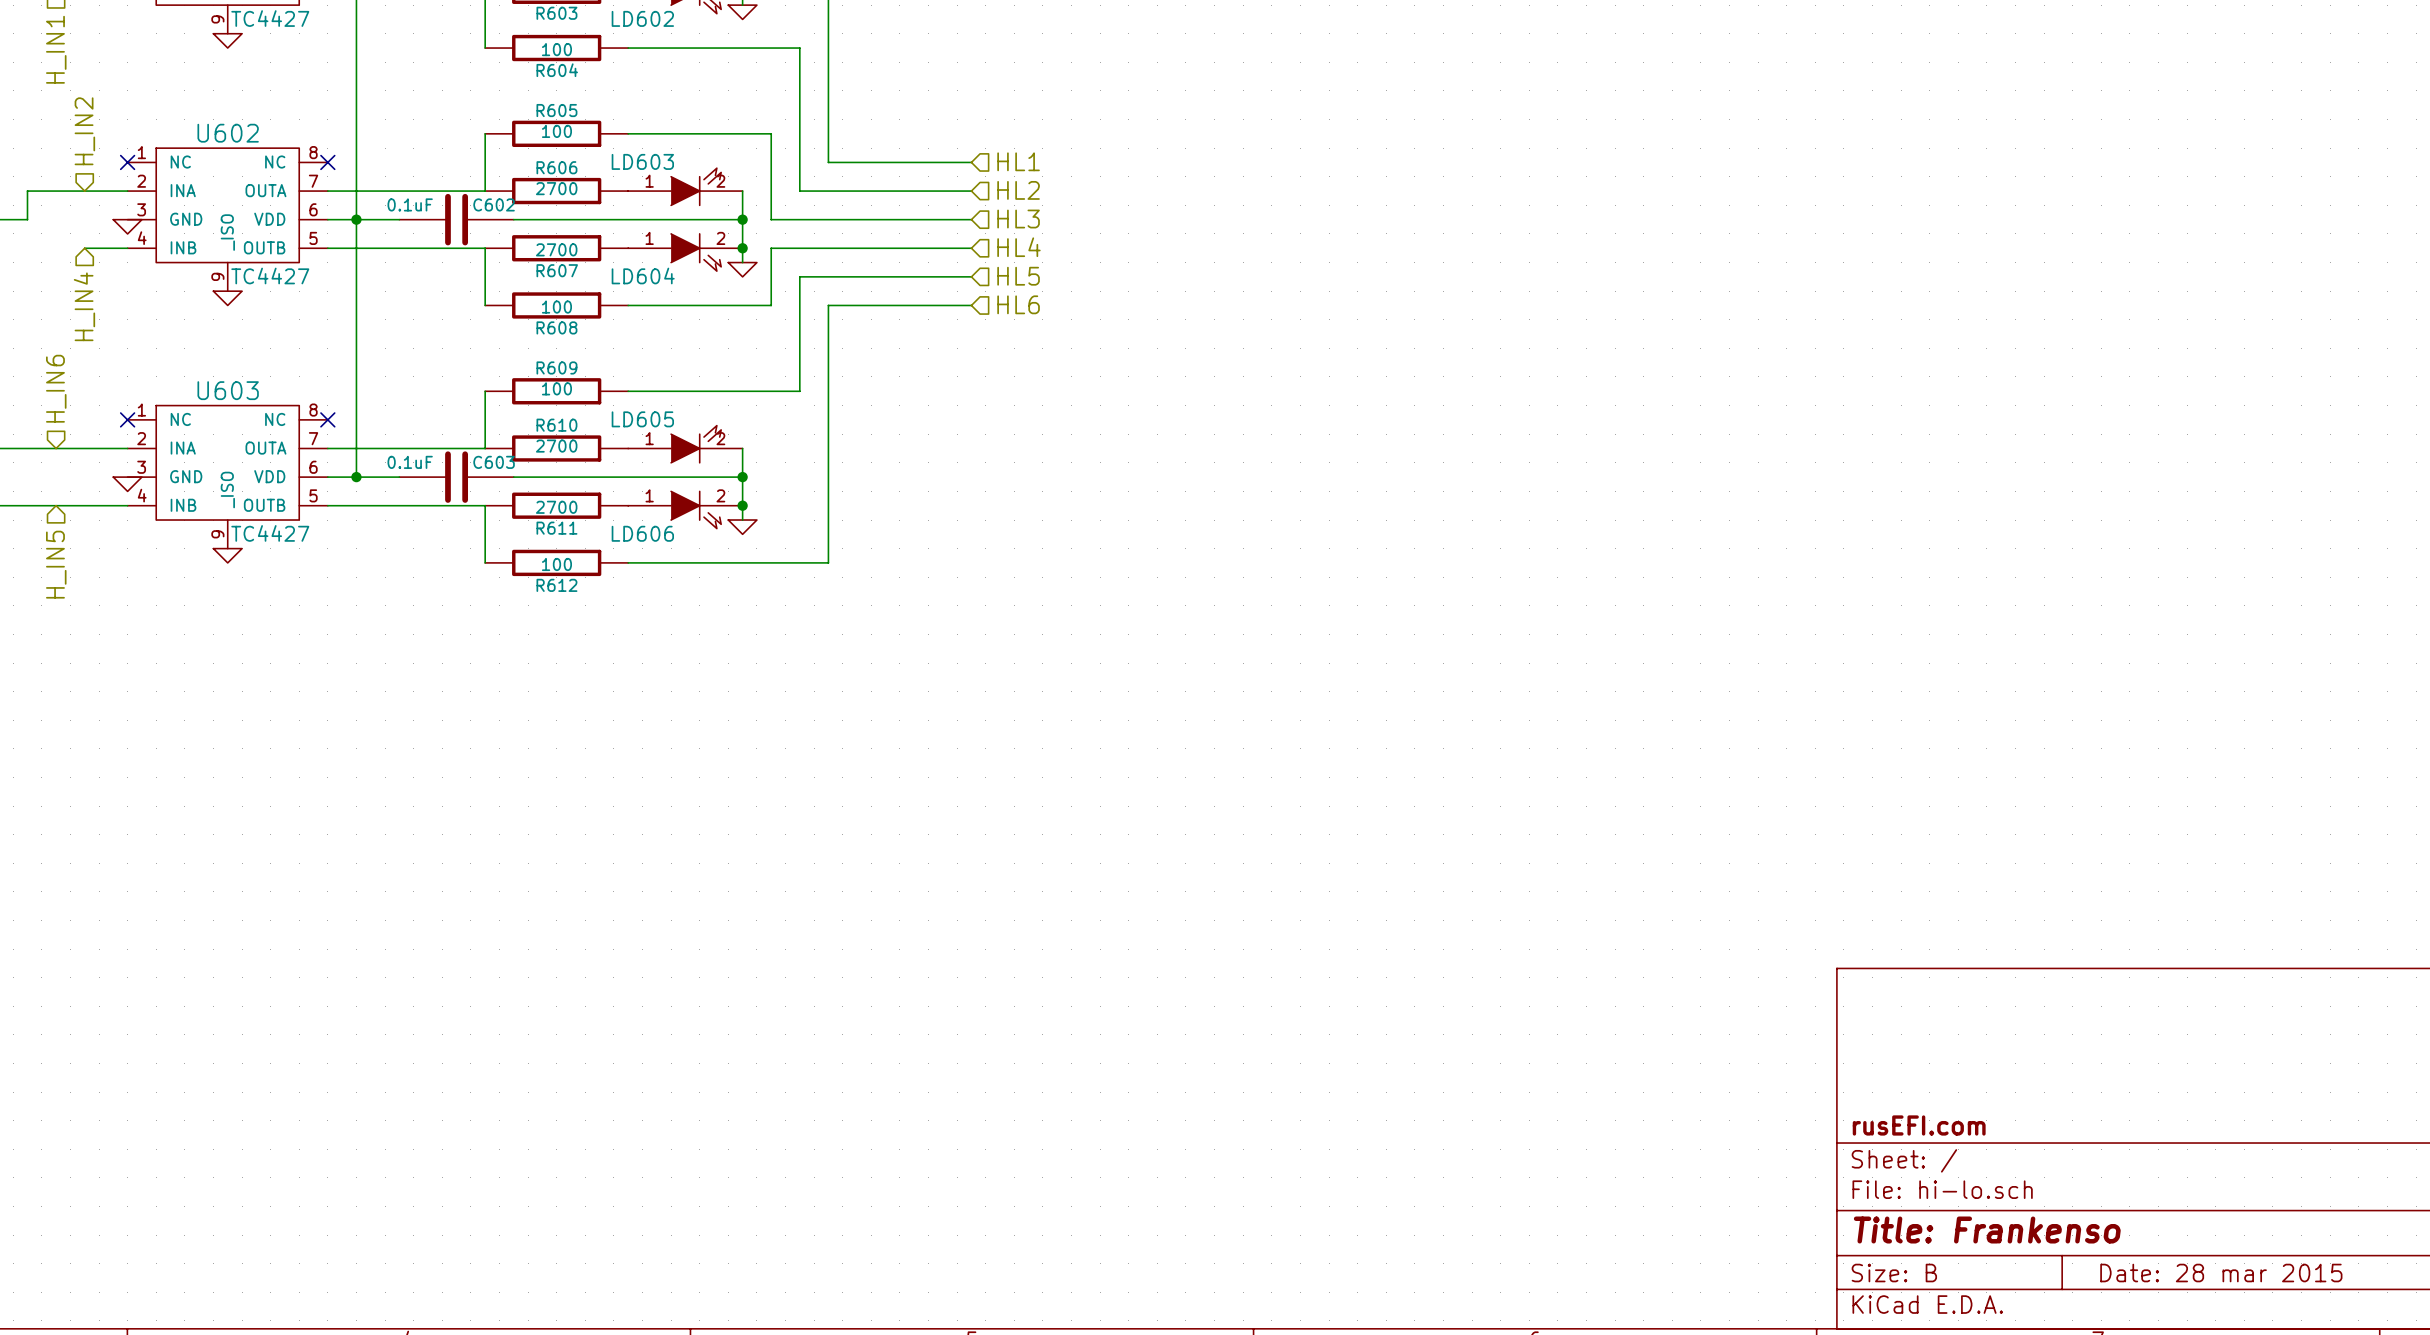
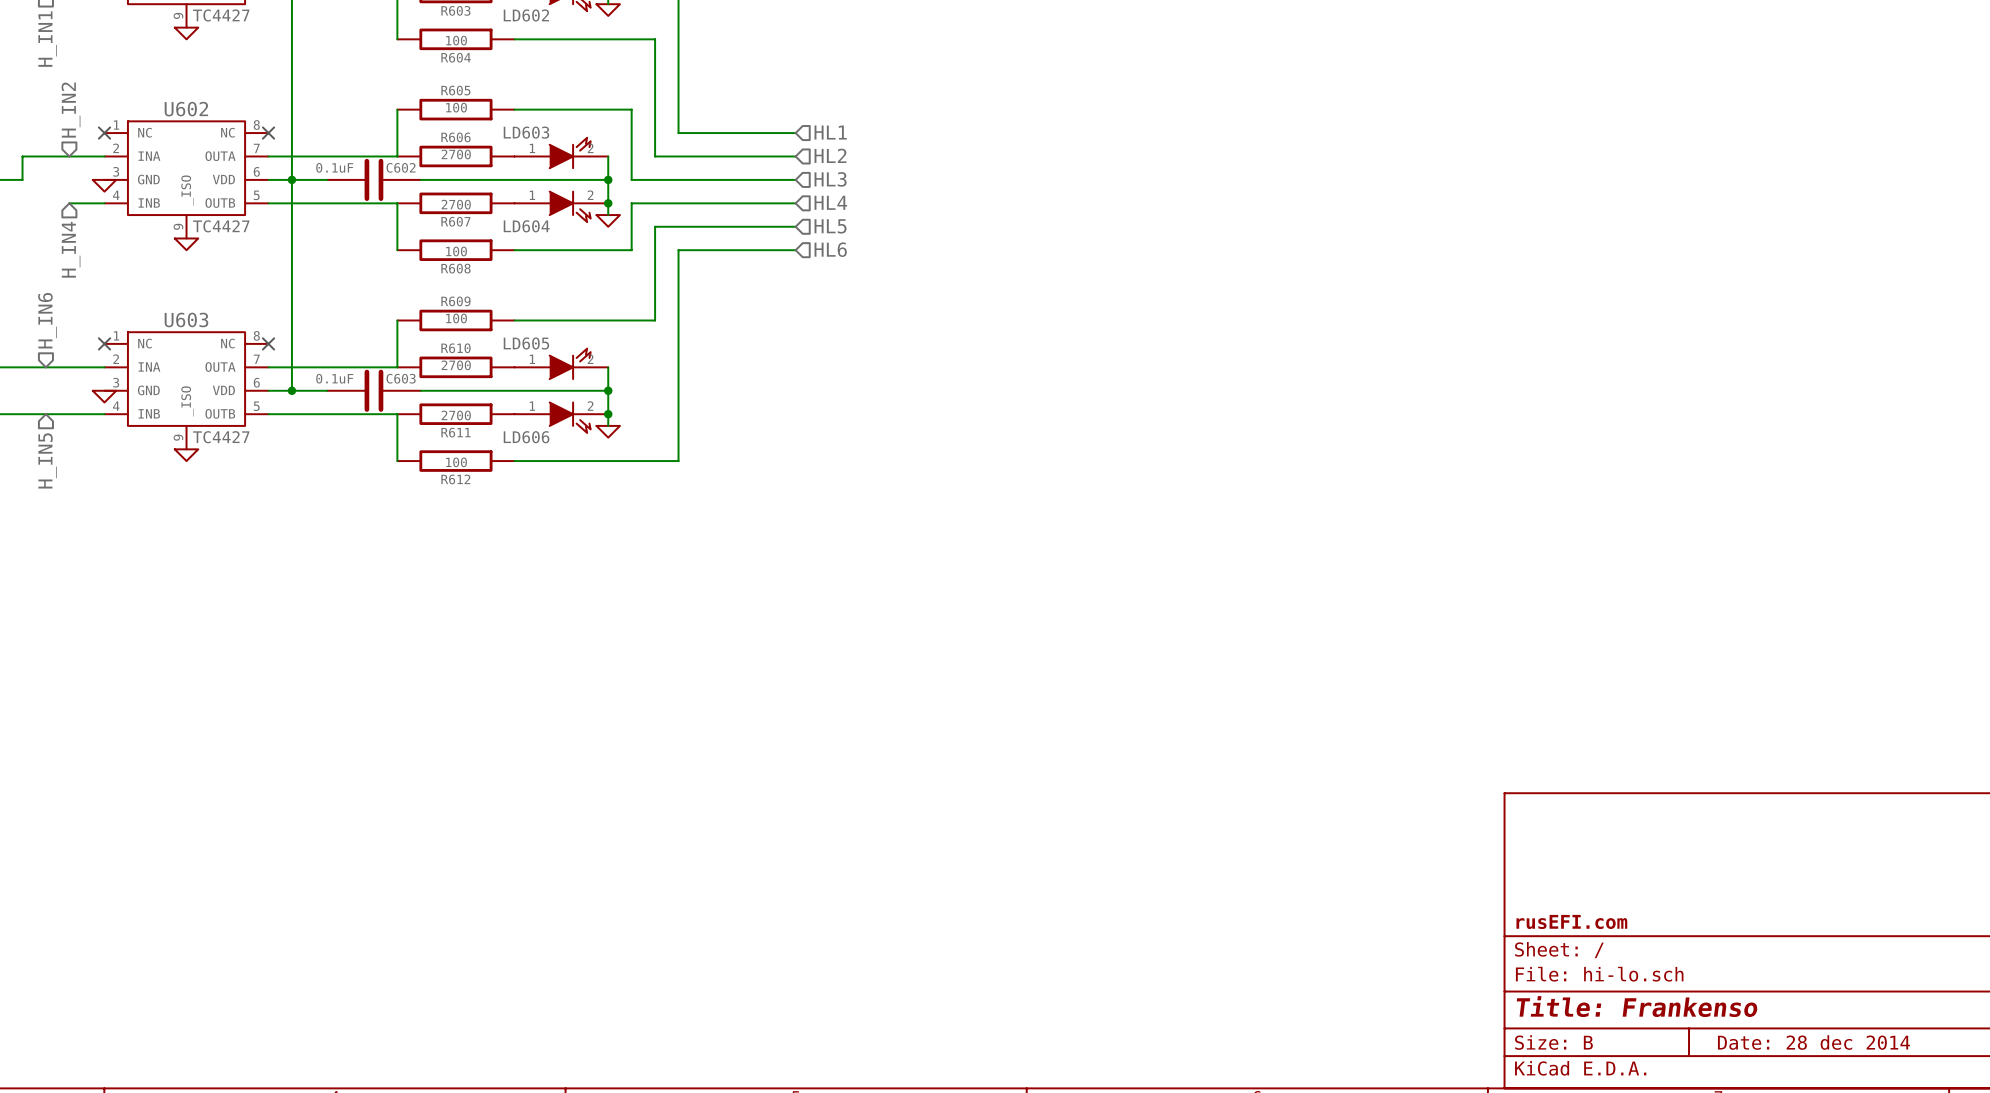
title block: Date: 28 mar 2015 (2221, 1273) -> Date: 28 dec 2014 (1813, 1042)

